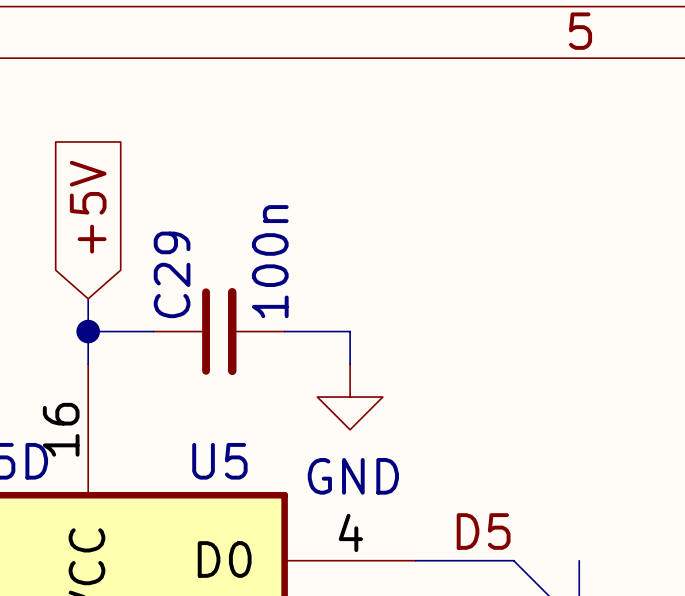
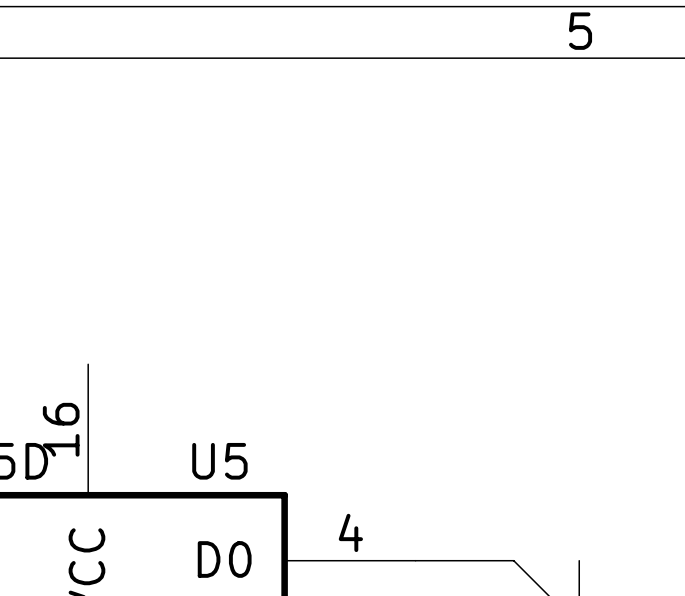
global label: +5V (88, 207) -> none
wire: (88, 298) (88, 364) -> none
wire: (88, 331) (153, 331) -> none
junction: (88, 331) -> none
C29: 100n (219, 331) -> none
wire: (284, 331) (350, 331) (350, 364) -> none
power symbol: GND (350, 397) -> none
label: D5 (483, 531) -> none

